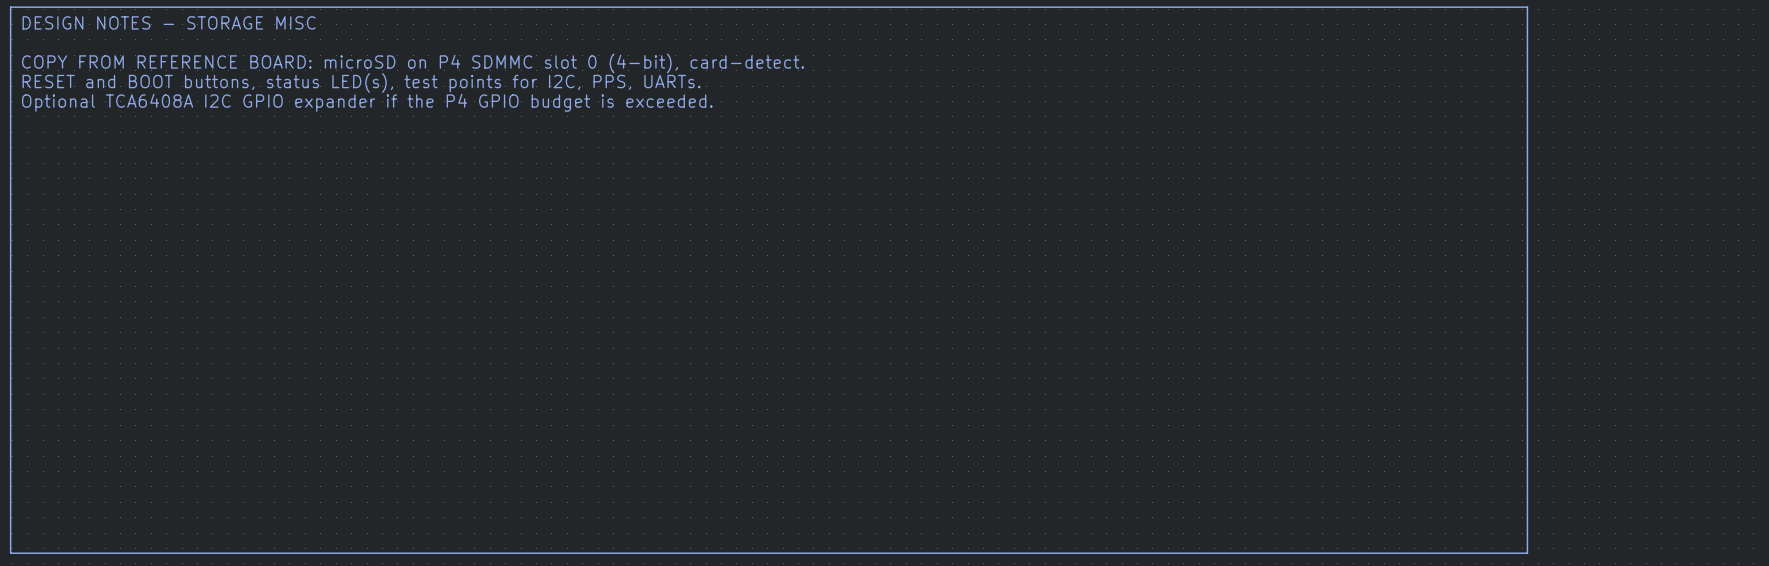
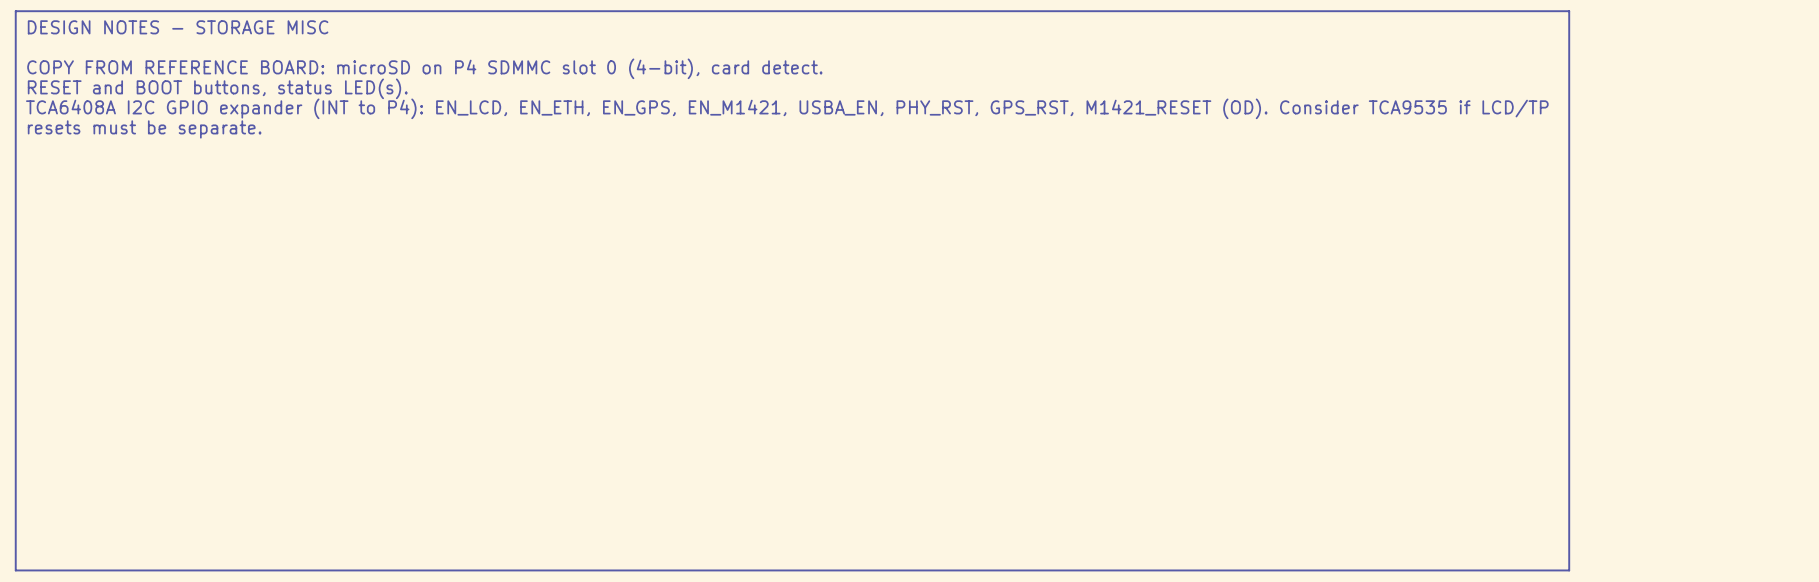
text: COPY FROM REFERENCE BOARD: microSD on P4 SDMMC slot 0 (4-bit), card-detect. (412, 63) -> COPY FROM REFERENCE BOARD: microSD on P4 SDMMC slot 0 (4-bit), card detect. (424, 68)
text: RESET and BOOT buttons, status LED(s), test points for I2C, PPS, UARTs. (361, 82) -> RESET and BOOT buttons, status LED(s). (217, 88)
text: Optional TCA6408A I2C GPIO expander if the P4 GPIO budget is exceeded. (367, 102) -> TCA6408A I2C GPIO expander (INT to P4): EN_LCD, EN_ETH, EN_GPS, EN_M1421, USBA_EN, PHY_RST, GPS_RST, M1421_RESET (OD). Consider TCA9535 if LCD/TP (787, 108)
text: none -> resets must be separate. (144, 129)

